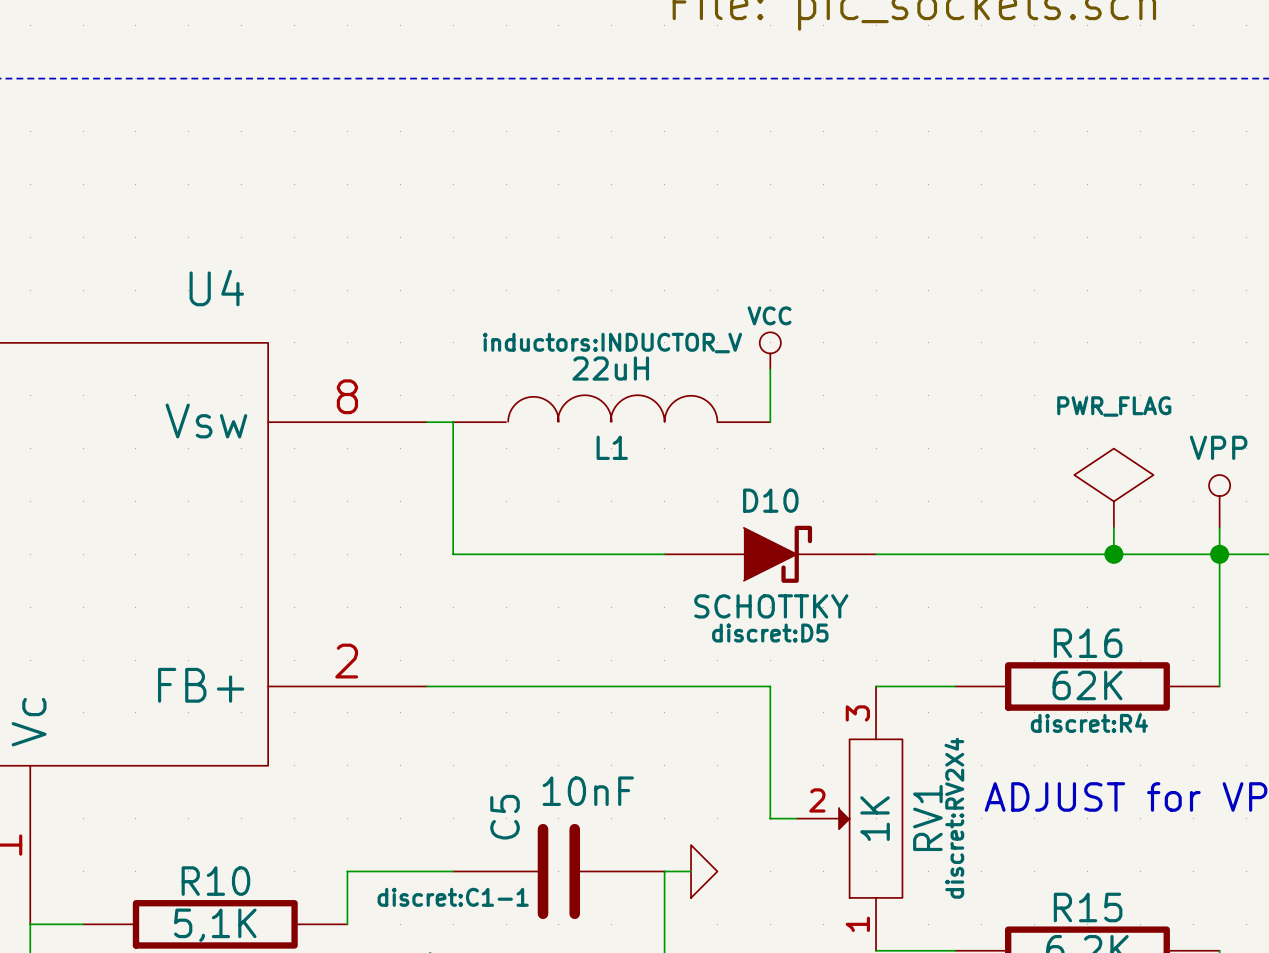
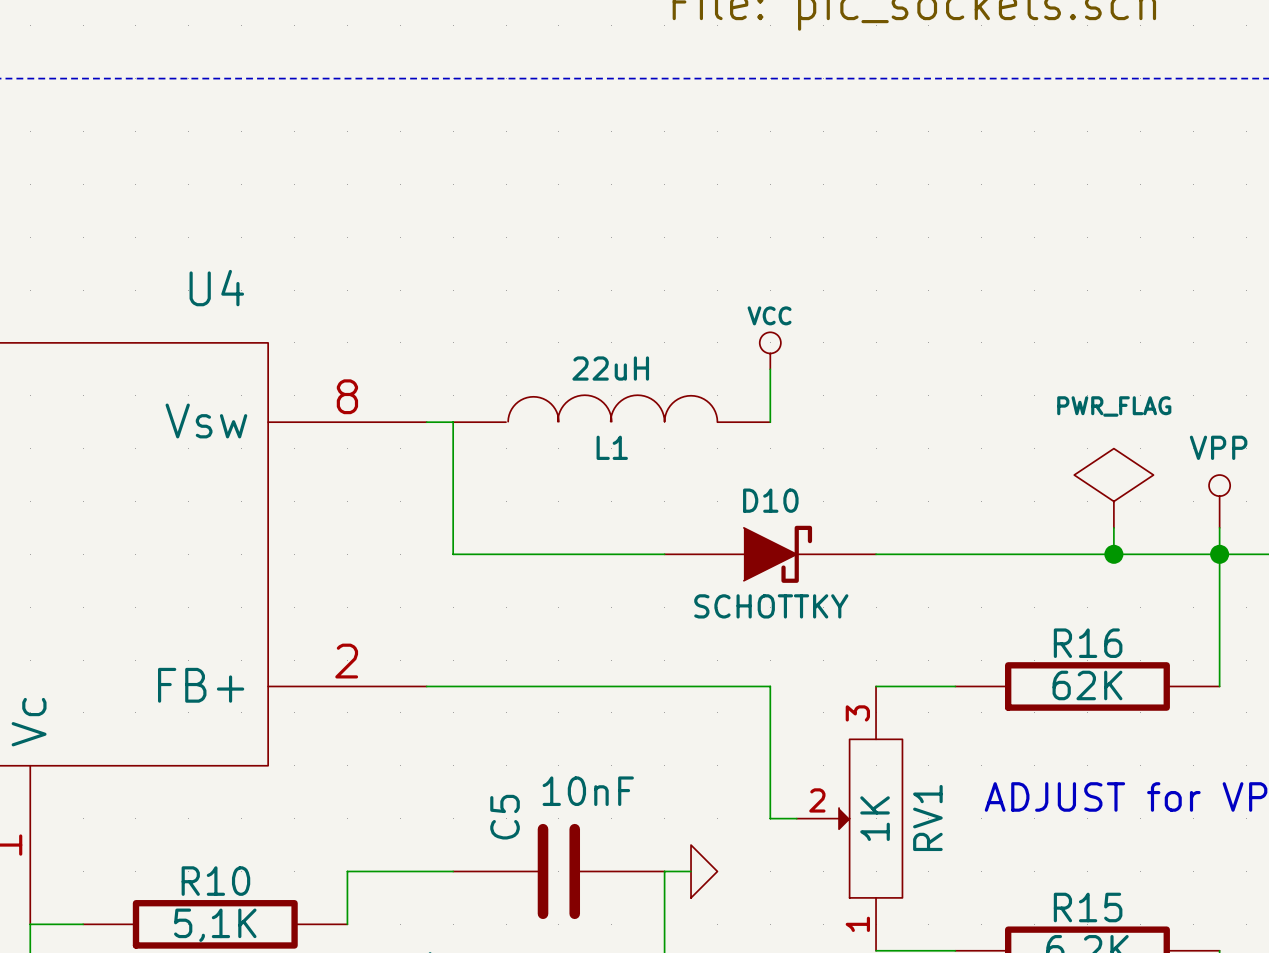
L1 text: inductors:INDUCTOR_V (612, 343) -> none
D10 text: discret:D5 (770, 633) -> none
R16 text: discret:R4 (1089, 723) -> none
RV1 text: discret:RV2X4 (954, 818) -> none
C5 text: discret:C1-1 (453, 897) -> none

